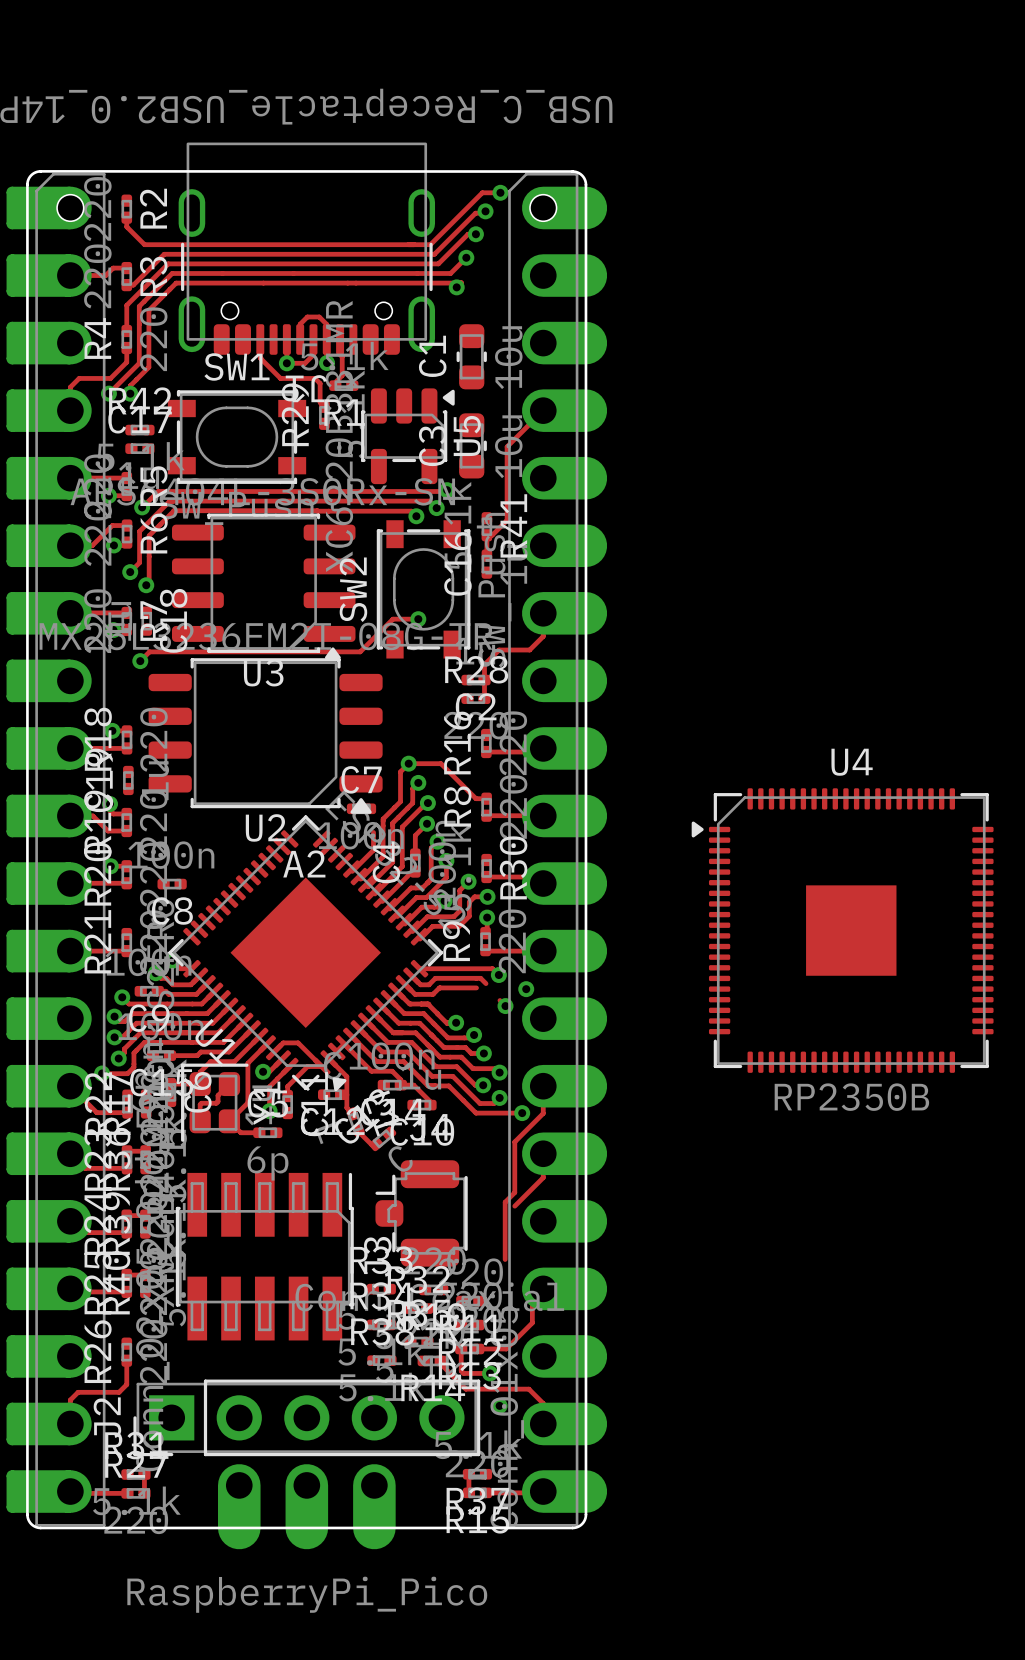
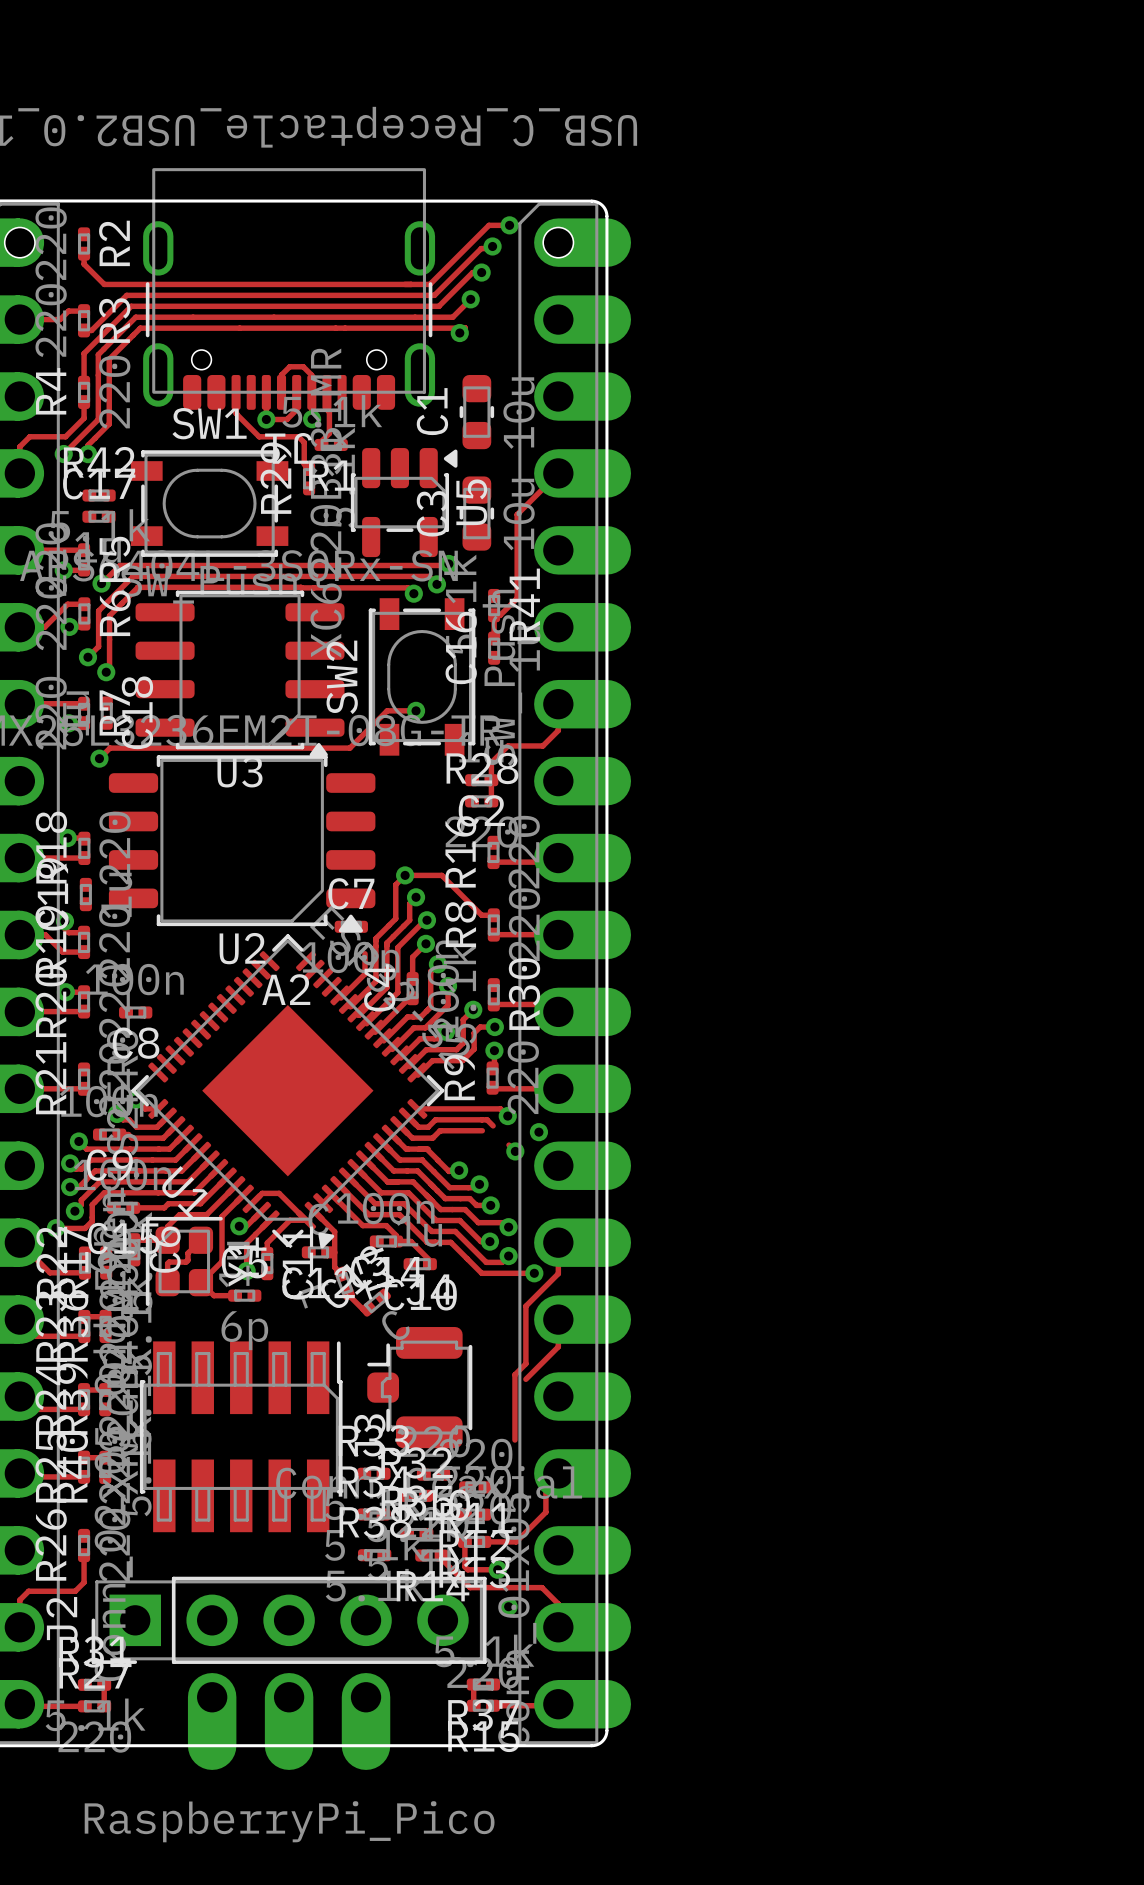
U4: RP2350B (842, 930) -> none

